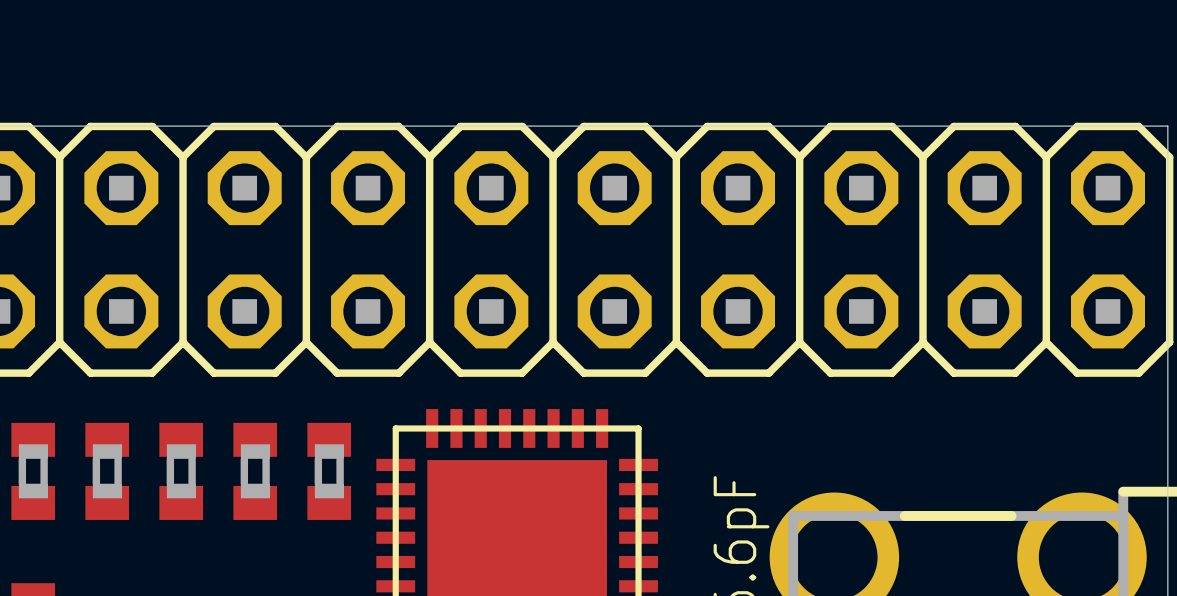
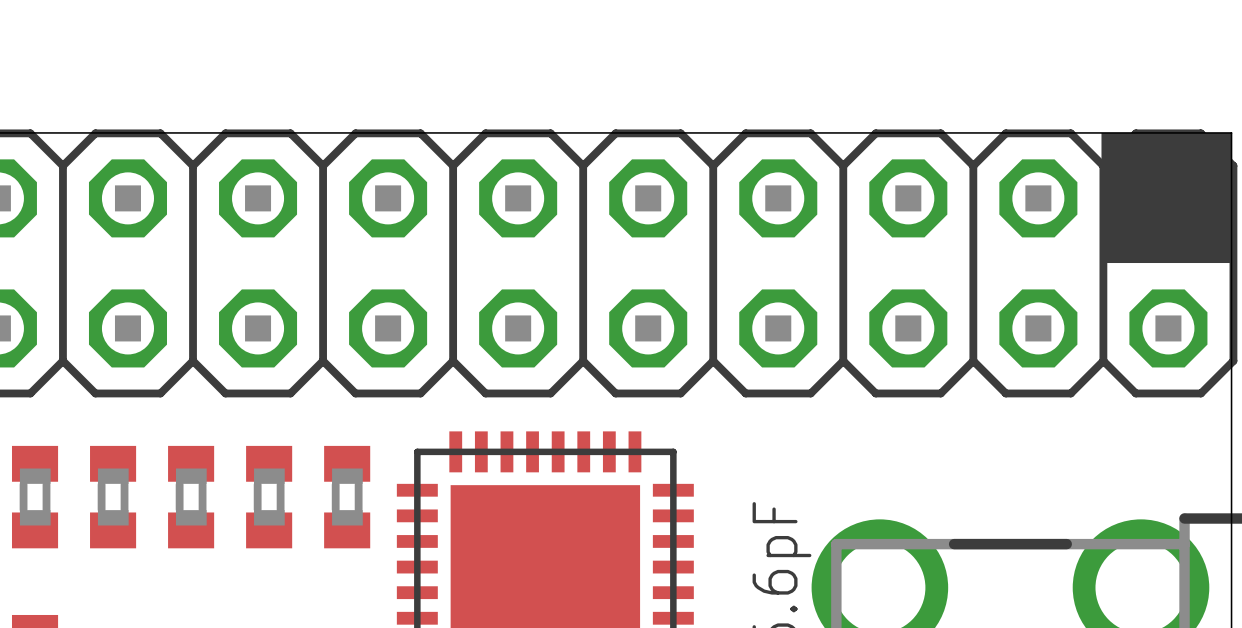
drawing: none -> [1101, 132, 1232, 264]

